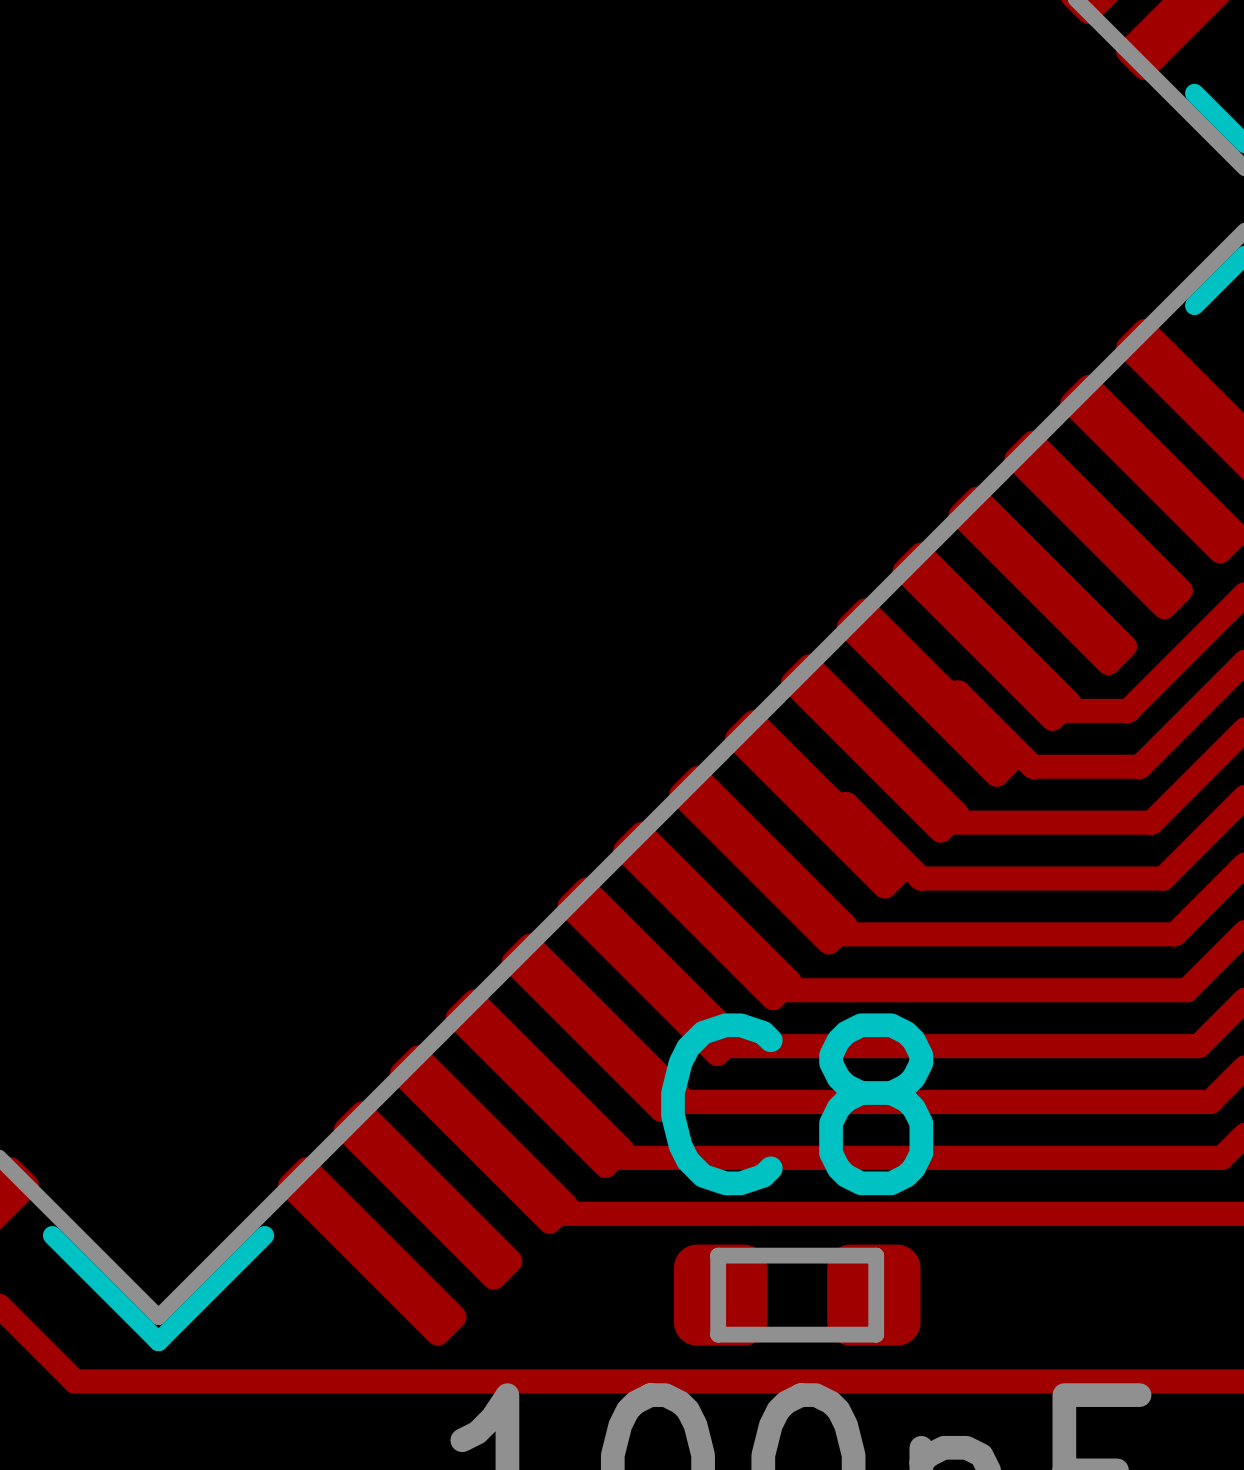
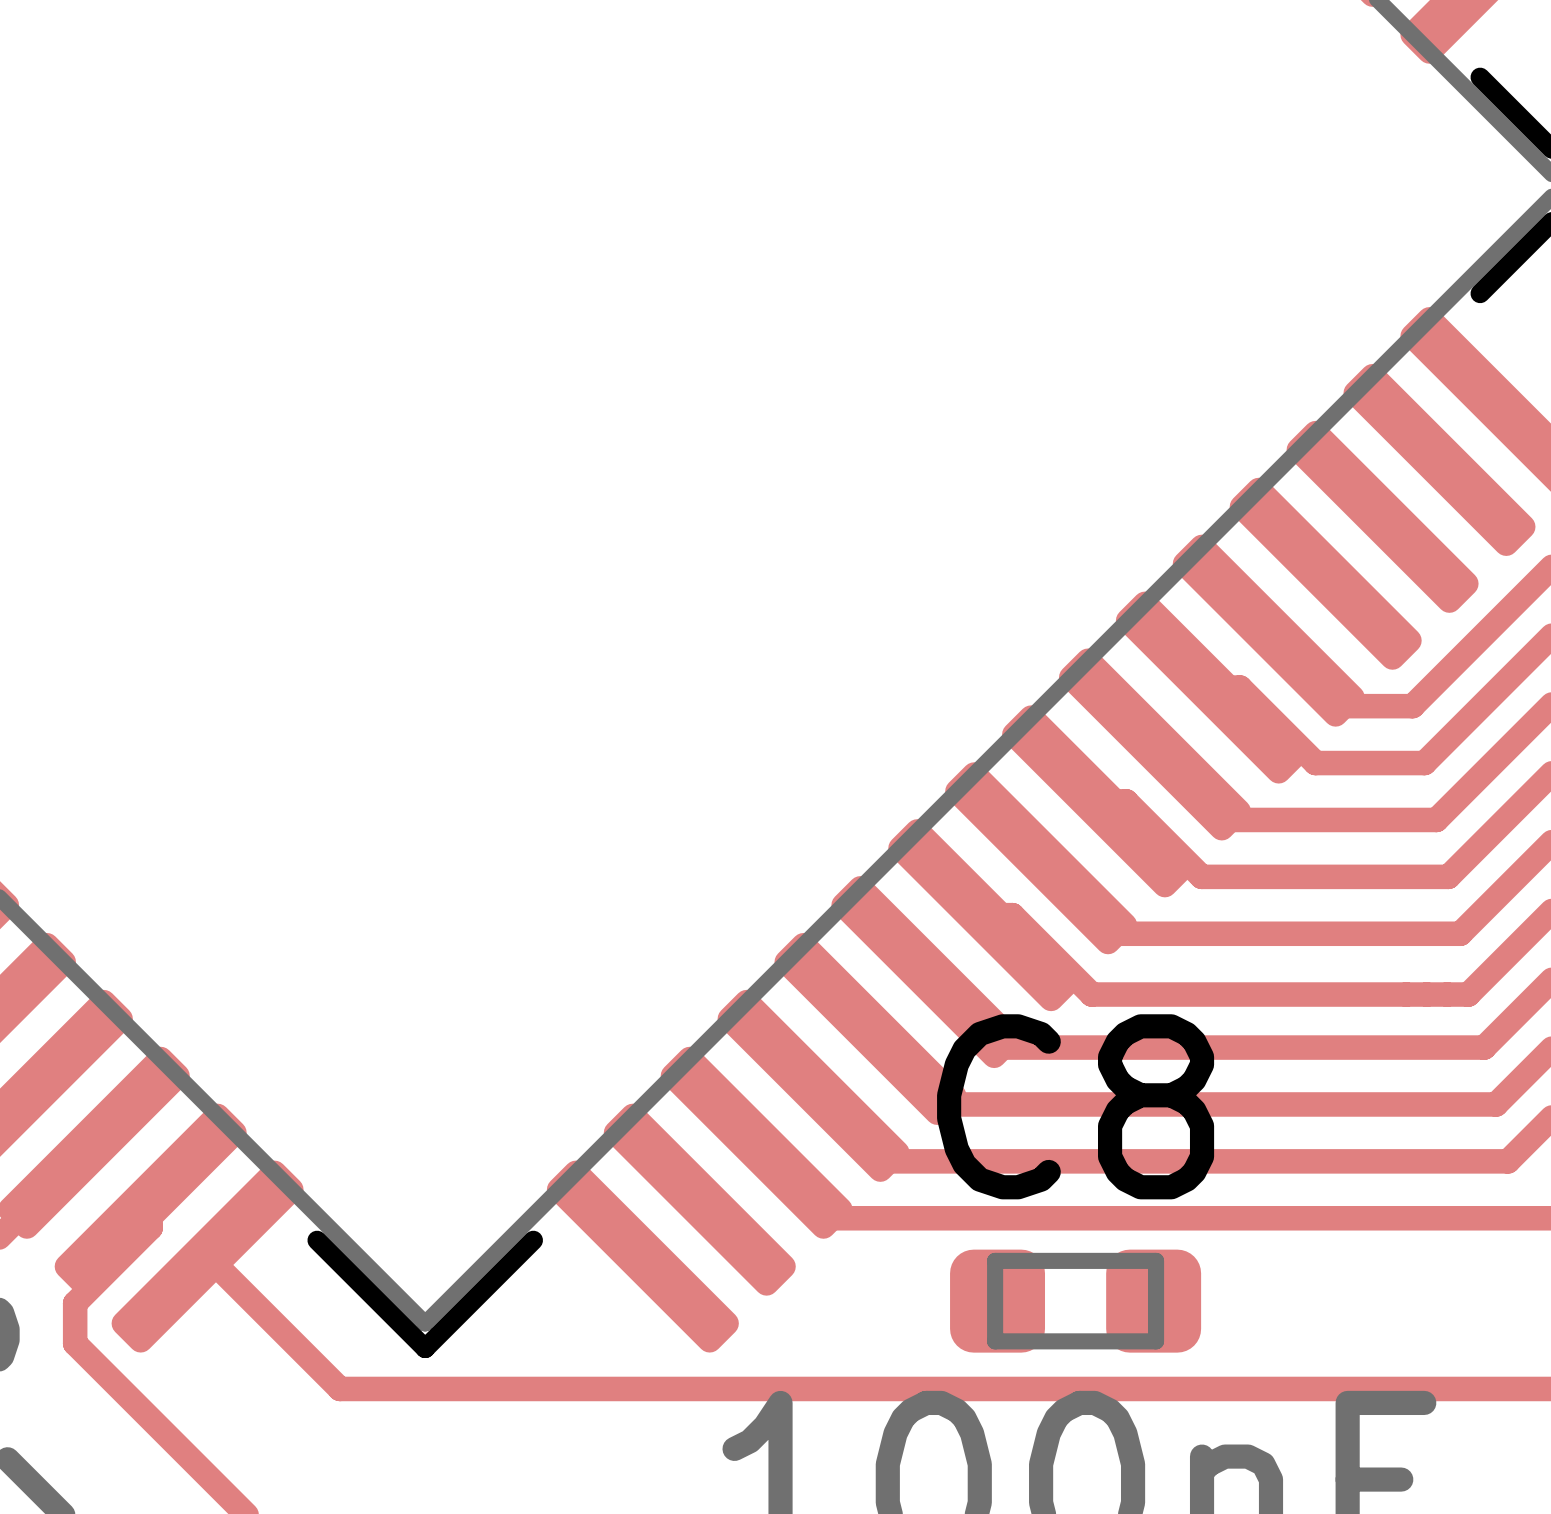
track: (707, 916) (781, 990) (1186, 990) -> (984, 915) (1012, 915) (1091, 994) (1468, 994) (1472, 990)

